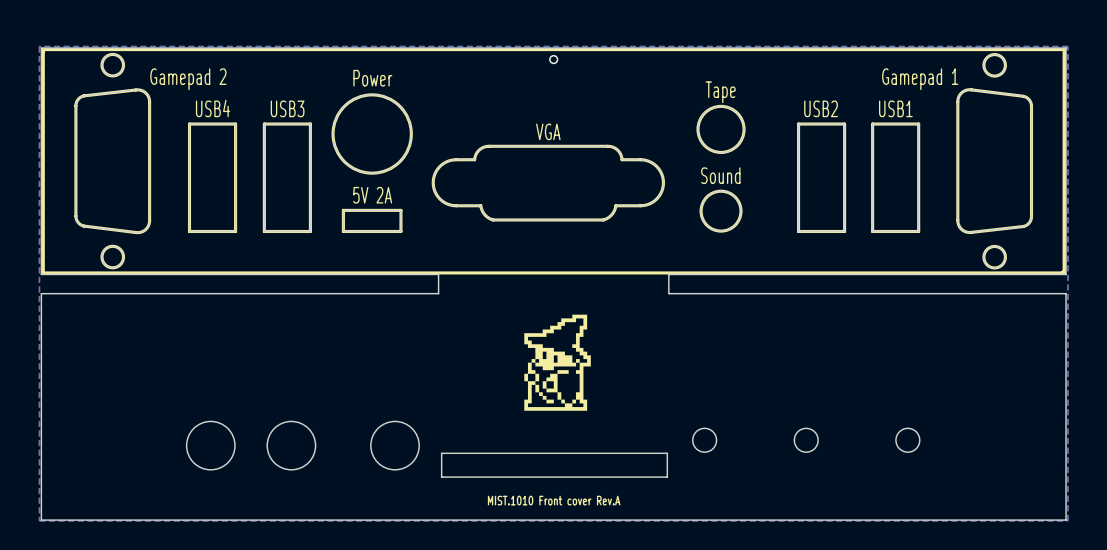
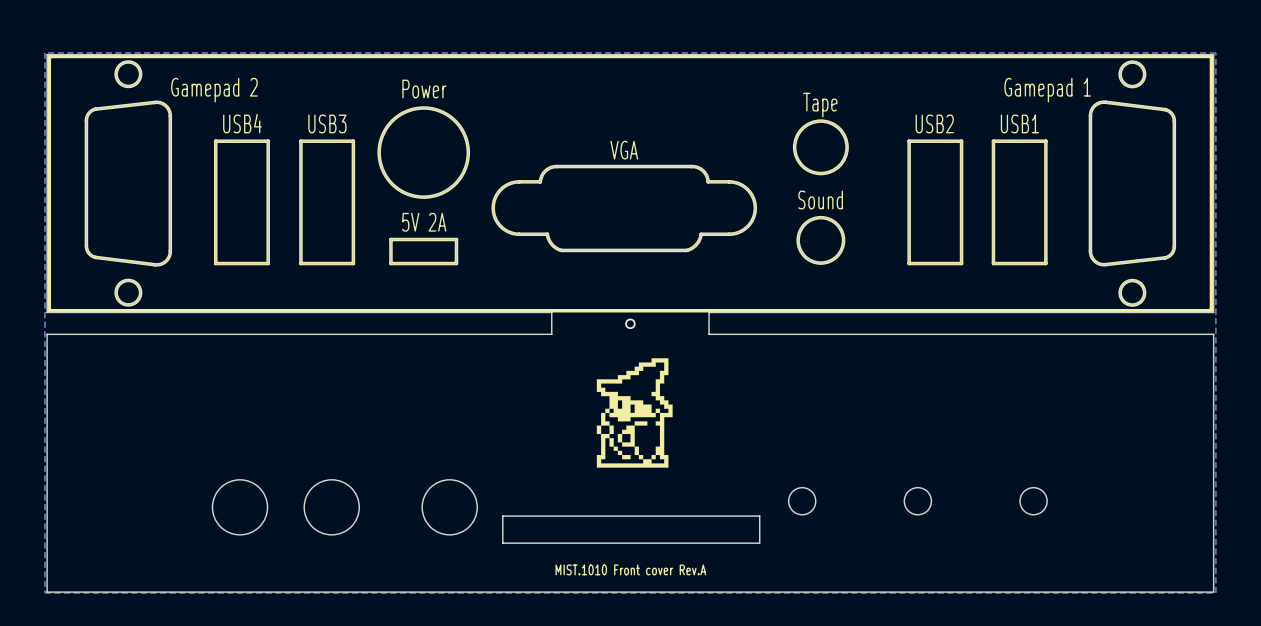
via: (553, 59) -> none
board edge: (438, 274) (438, 293) -> (499, 312) (551, 312) (551, 334) (499, 334)
board edge: (668, 274) (668, 293) -> (761, 312) (709, 312) (709, 334) (761, 334)
via: none -> (630, 323)

